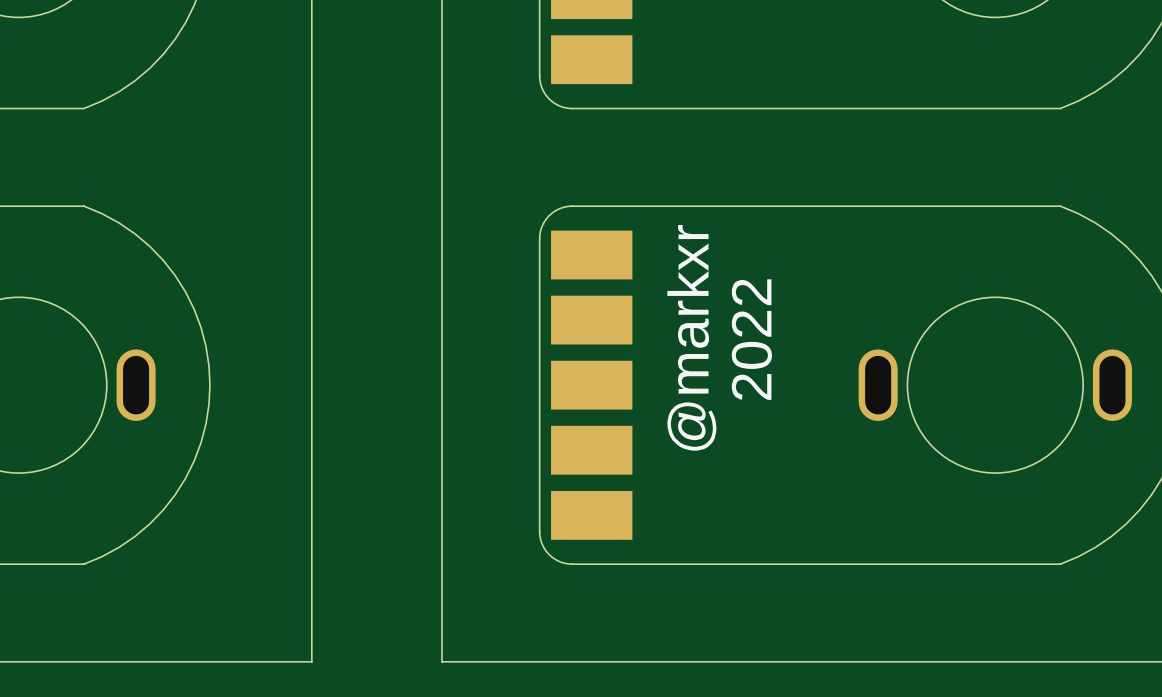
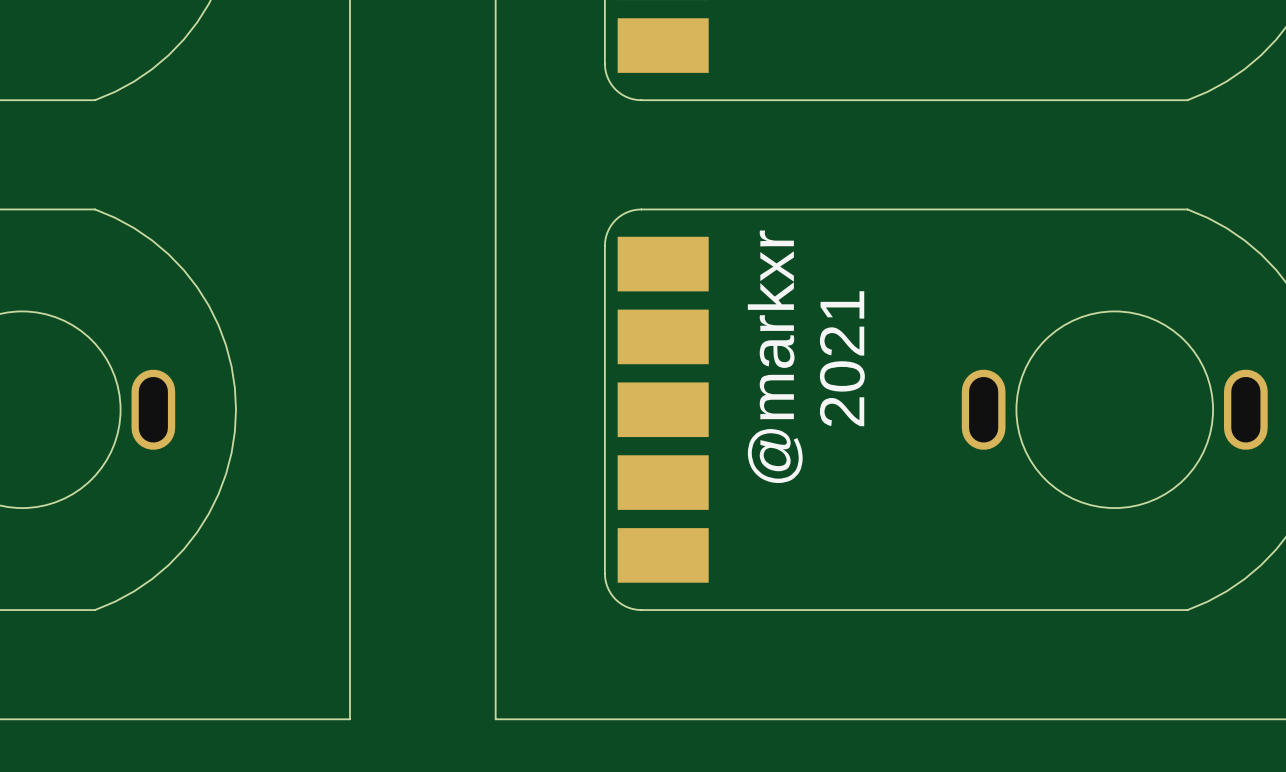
text: 2022 (751, 339) -> 2021 (842, 358)

